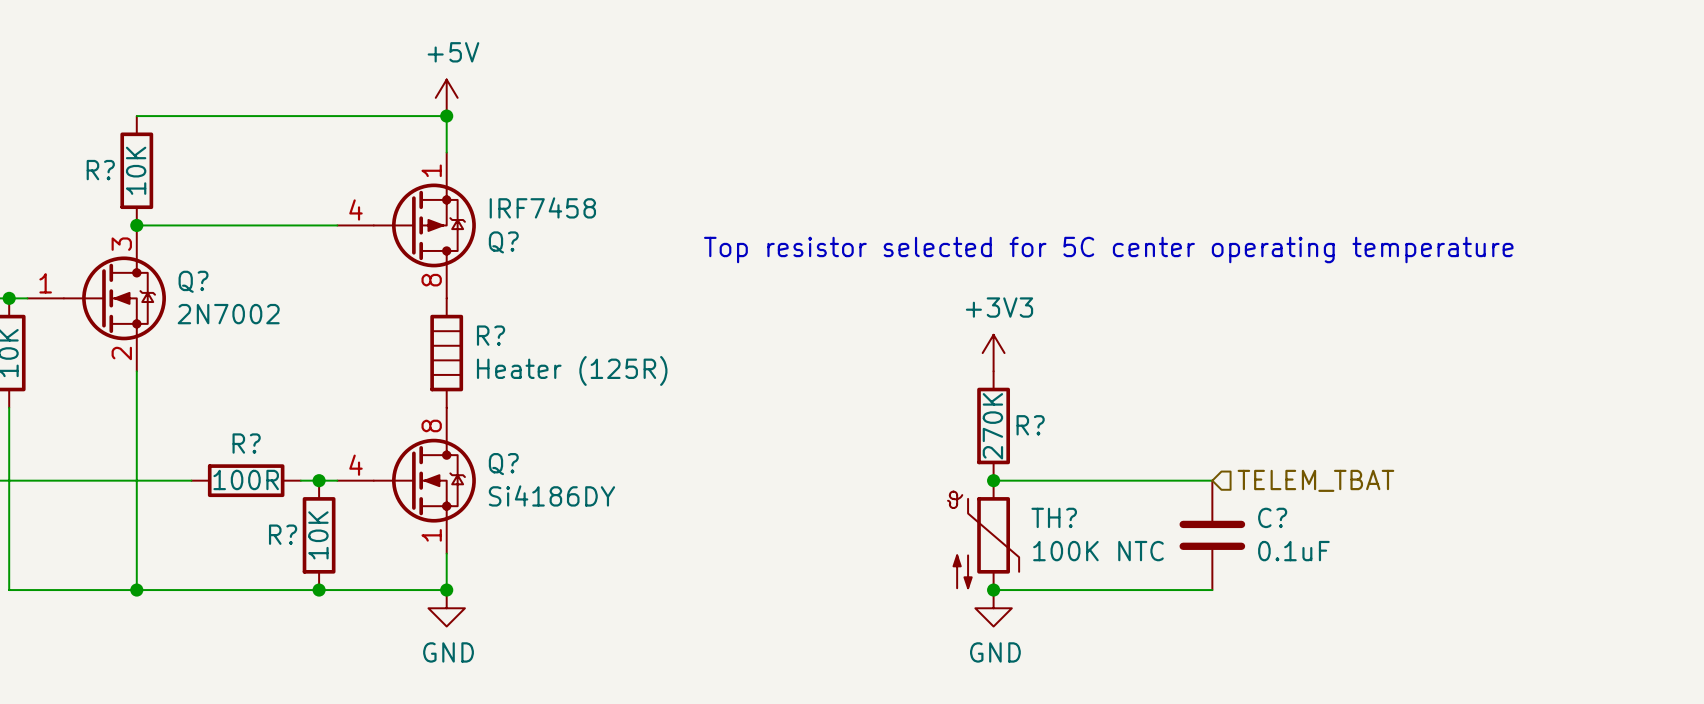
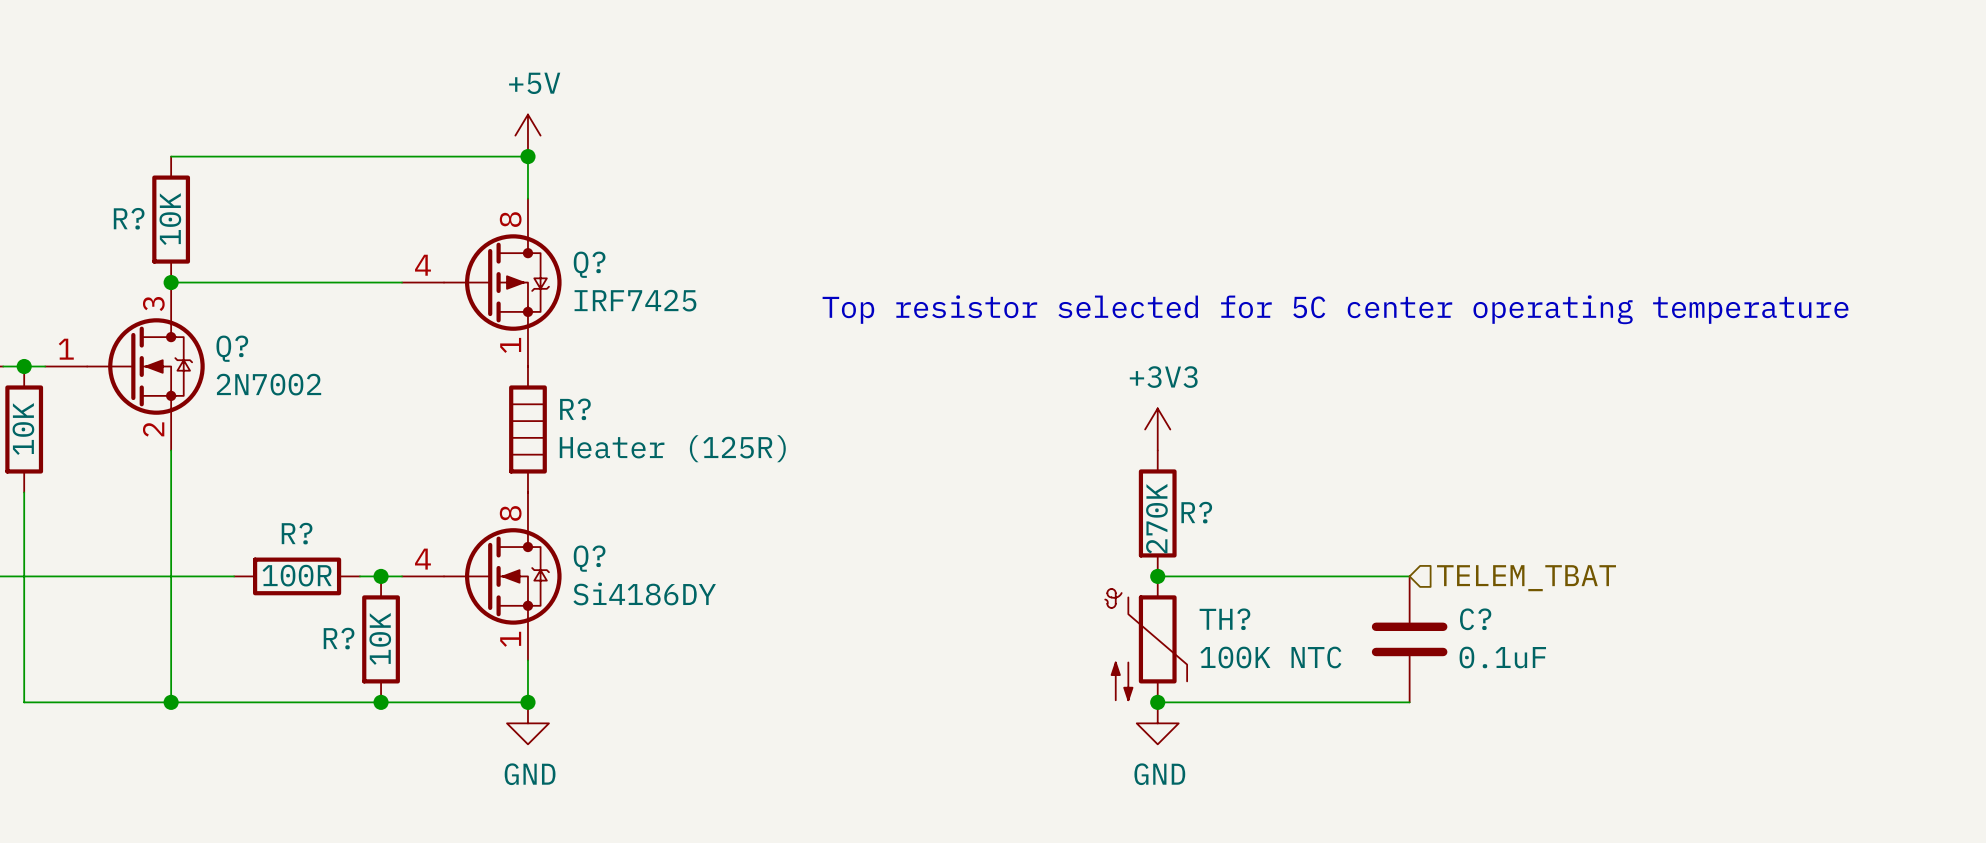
Q? value: IRF7458 (542, 207) -> IRF7425 (635, 300)
Q? flip: as is (424, 225) -> up-down (502, 282)

